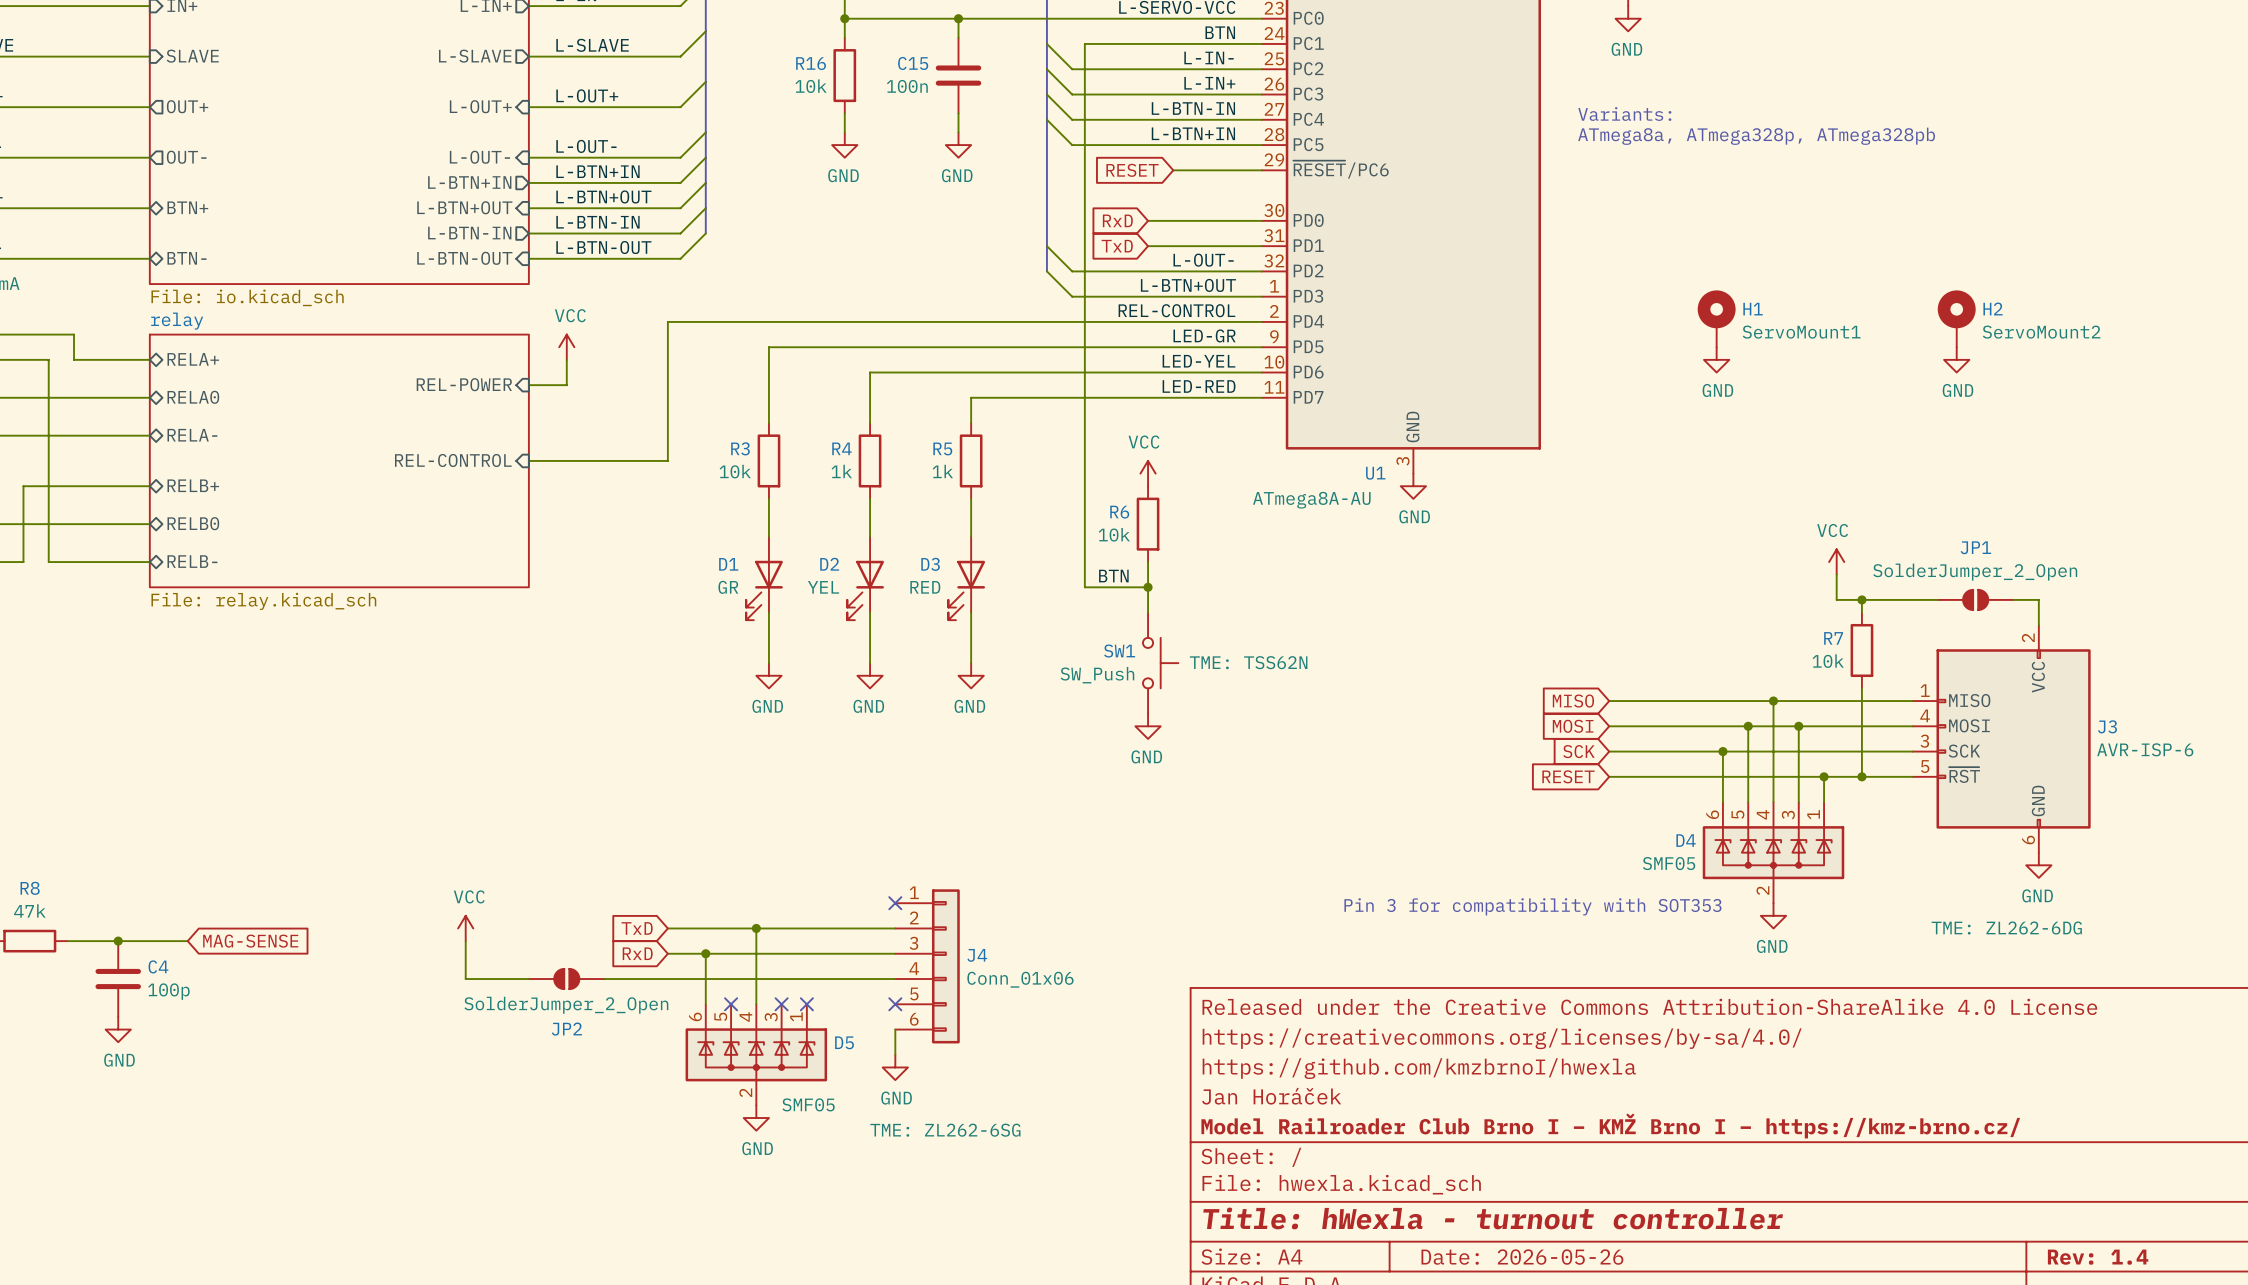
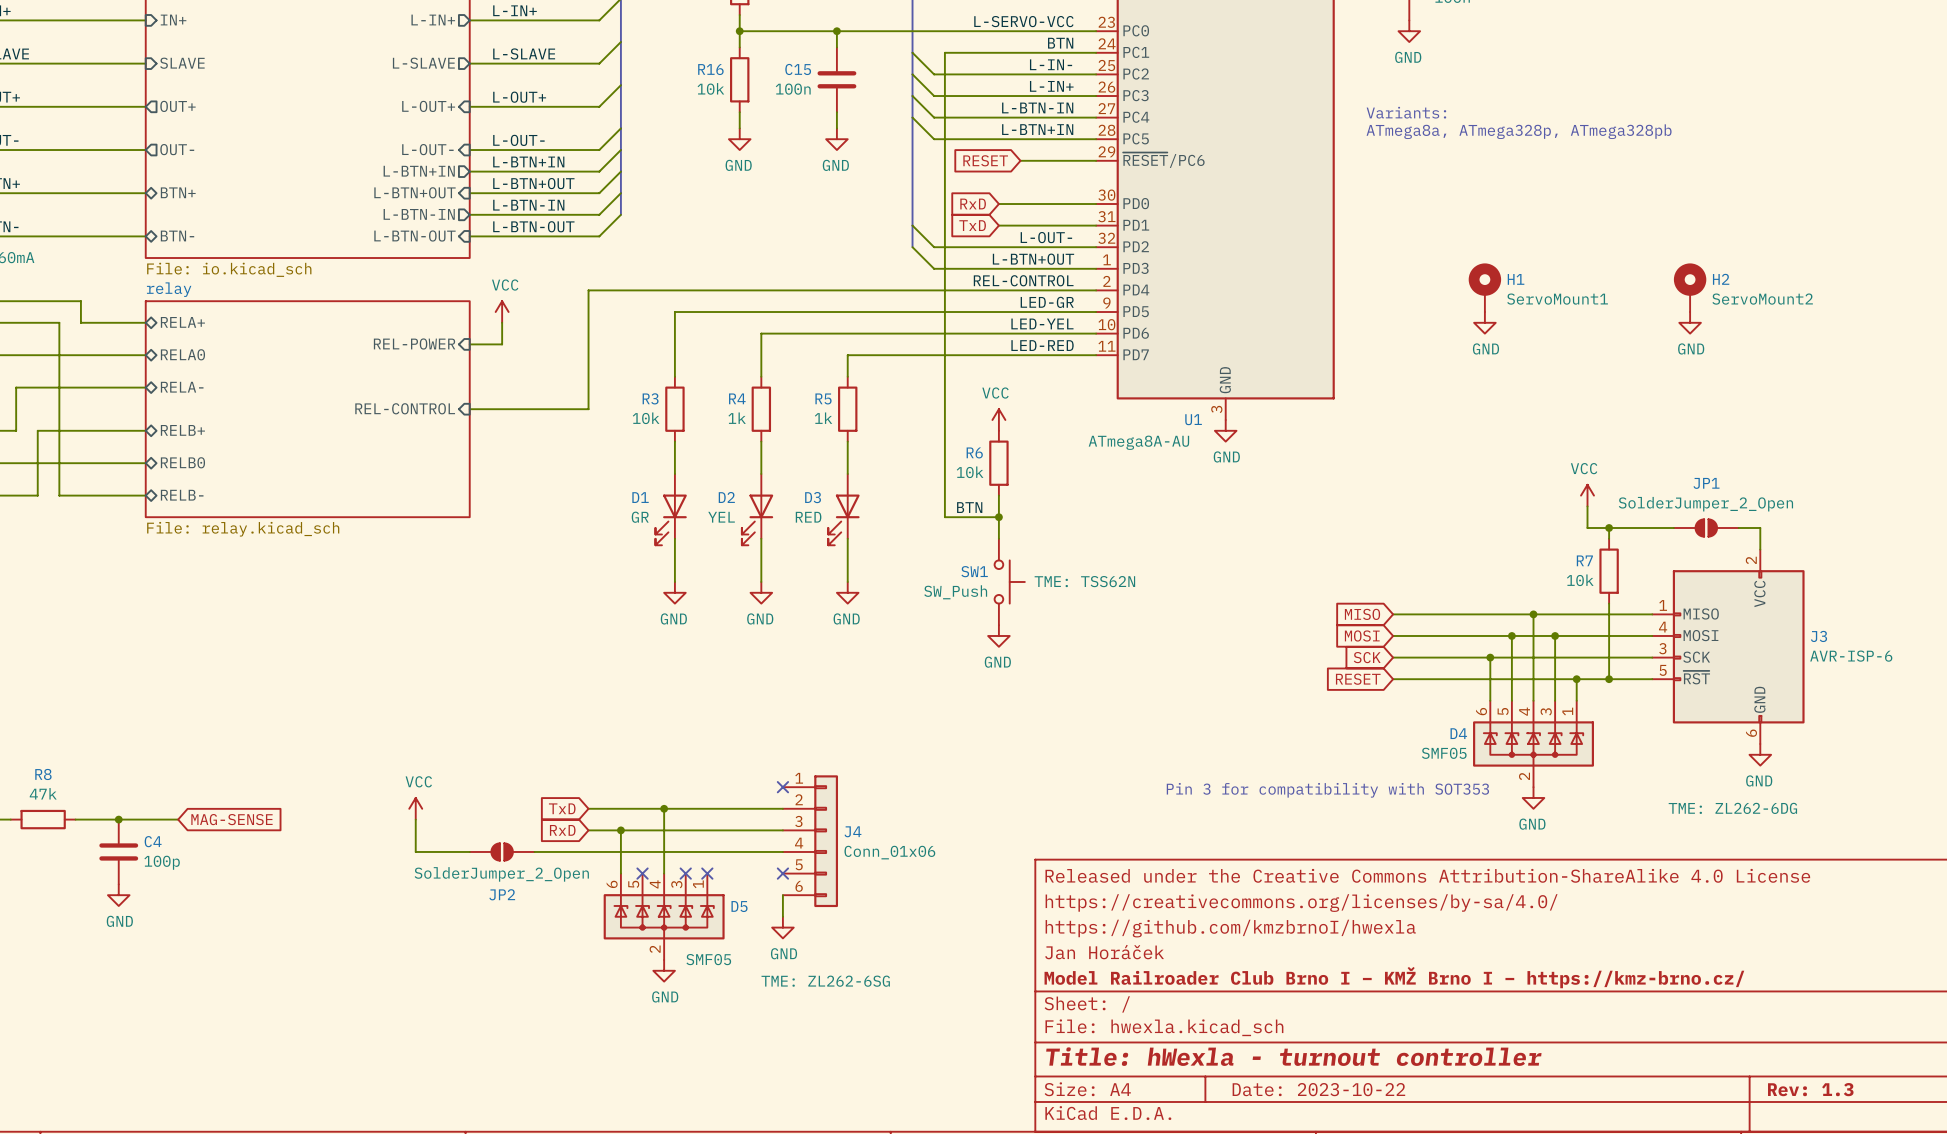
title block: Date: 2026-05-26 (1522, 1257) -> Date: 2023-10-22 (1318, 1089)
title block: Rev: 1.4 (2098, 1257) -> Rev: 1.3 (1810, 1089)

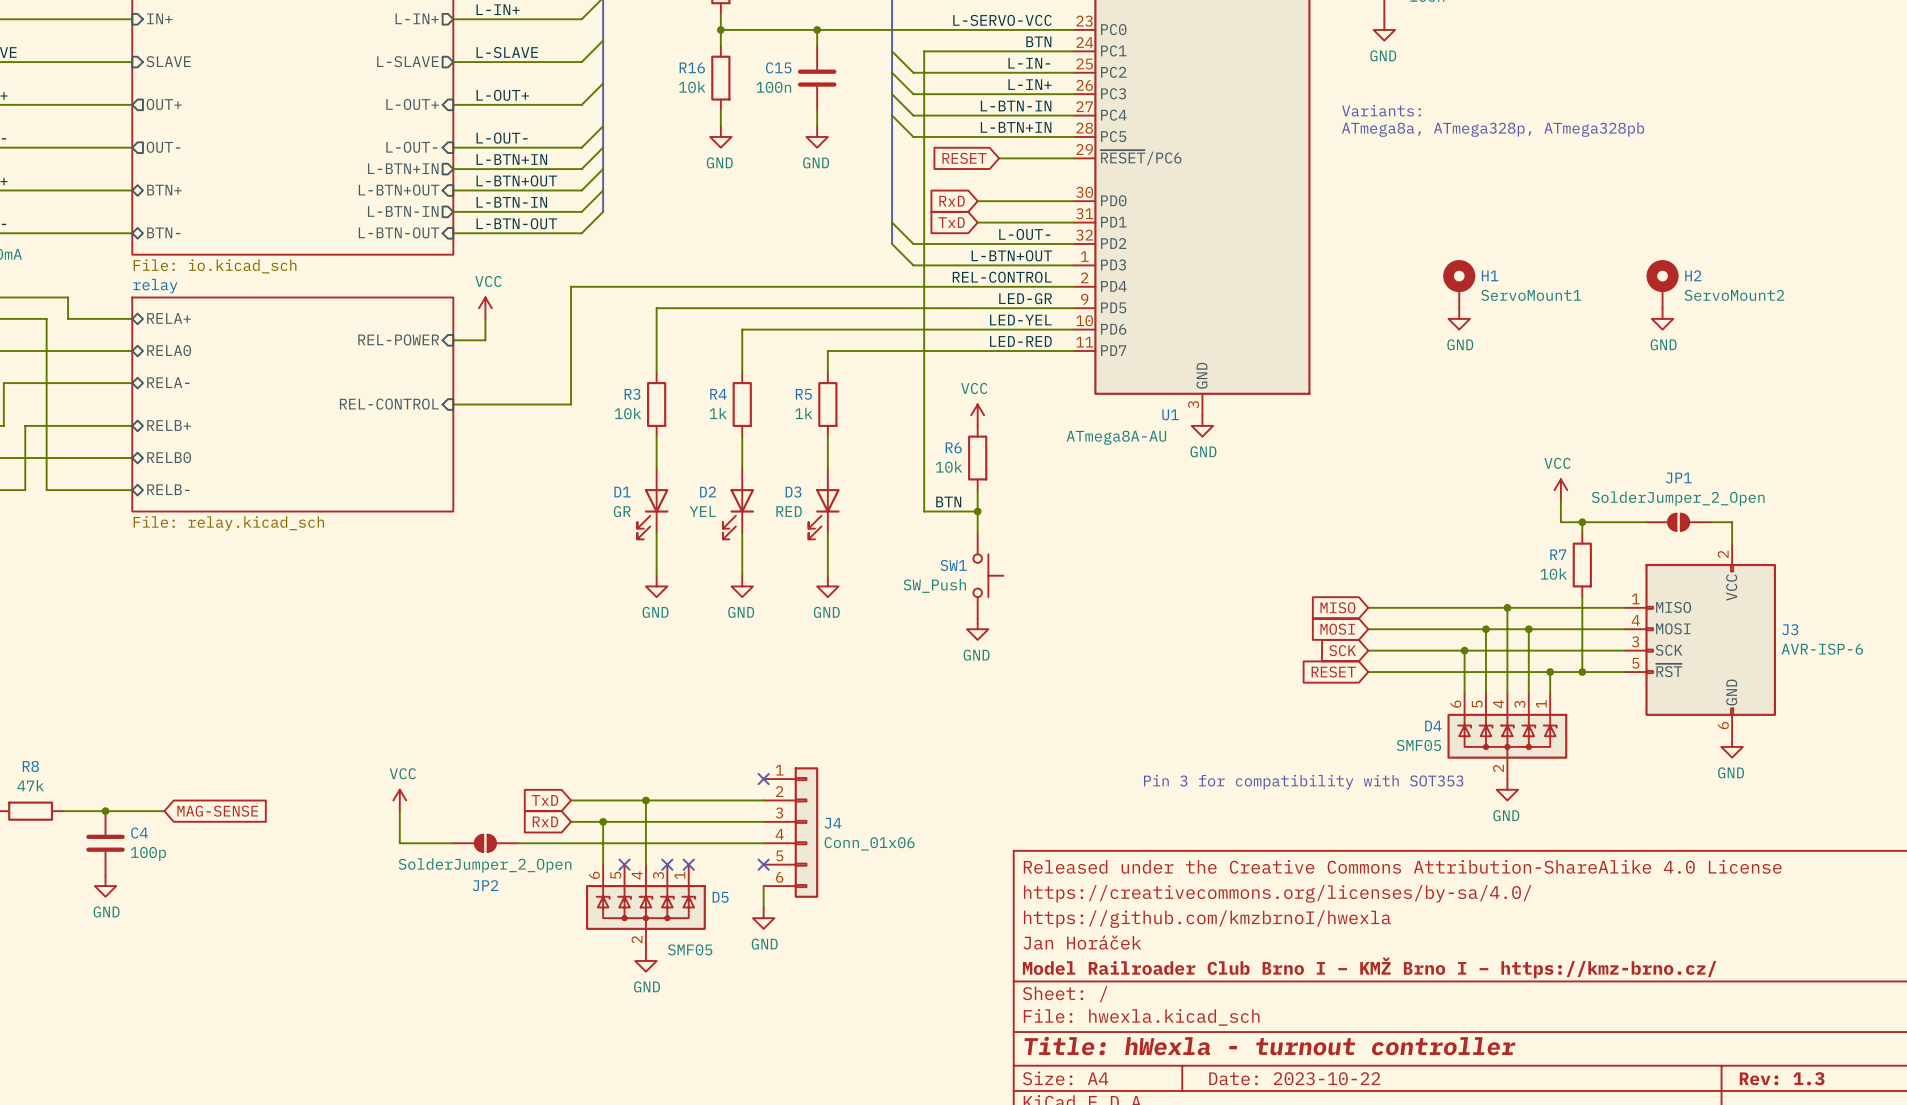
SW1 text: TME: TSS62N (1084, 581) -> none
J3 text: TME: ZL262-6DG (1732, 808) -> none
J4 text: TME: ZL262-6SG (825, 981) -> none

